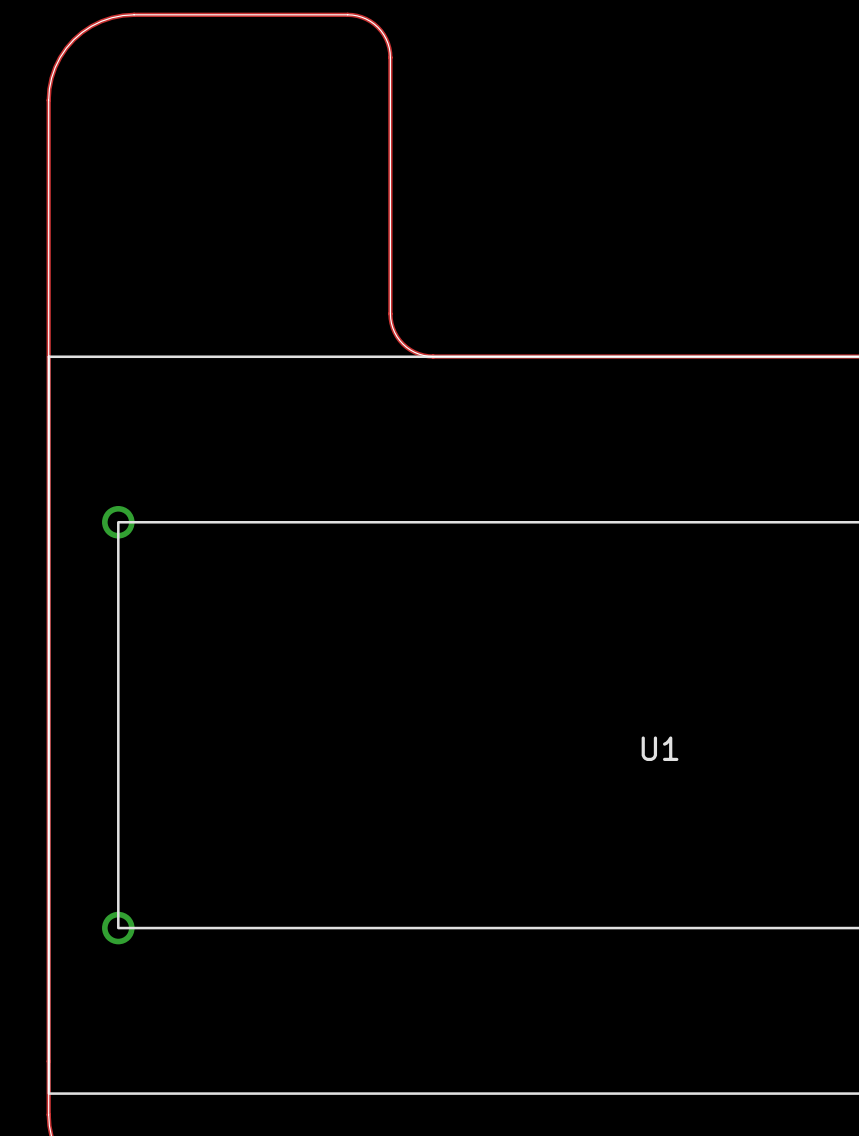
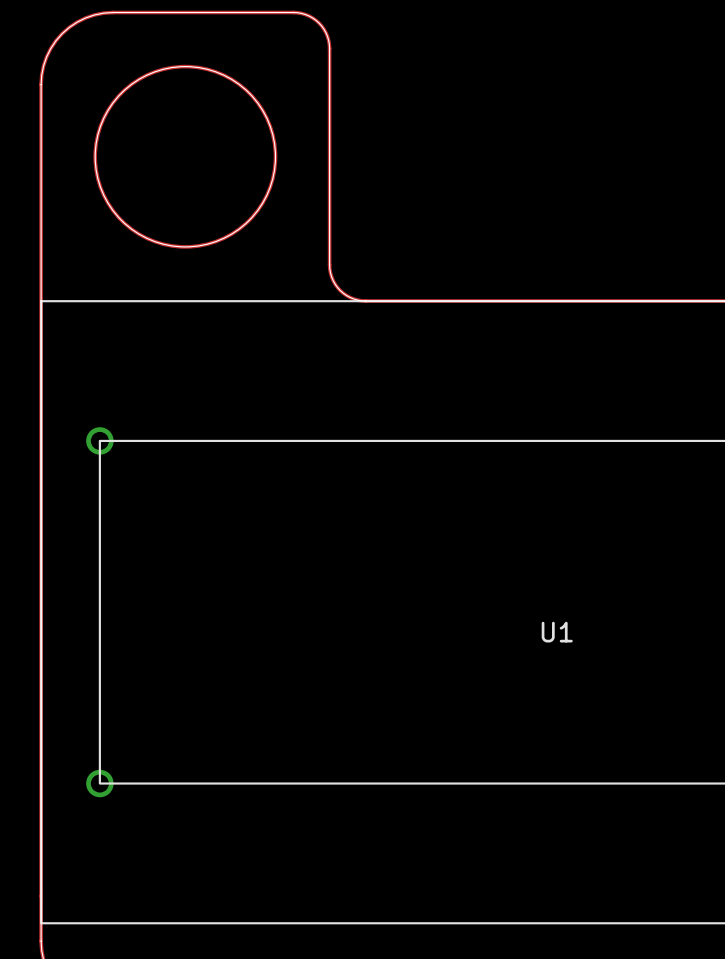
drawing: none -> [93, 64, 278, 249]
round board edge: none -> [94, 66, 276, 248]

